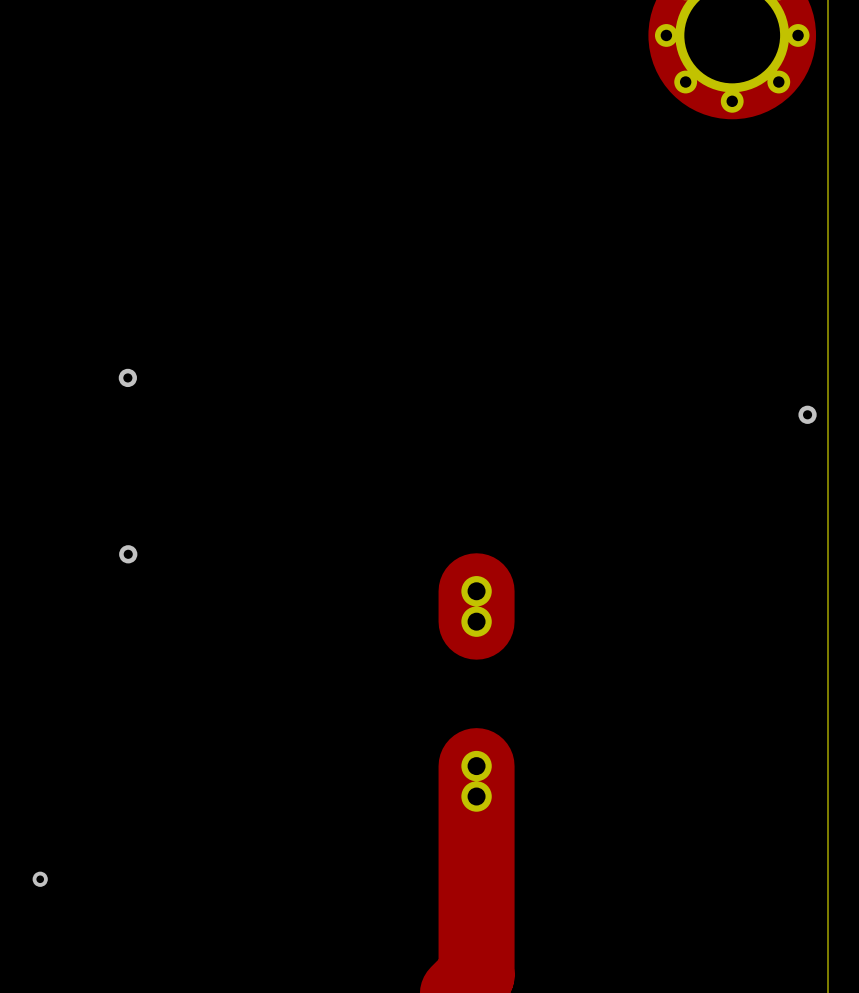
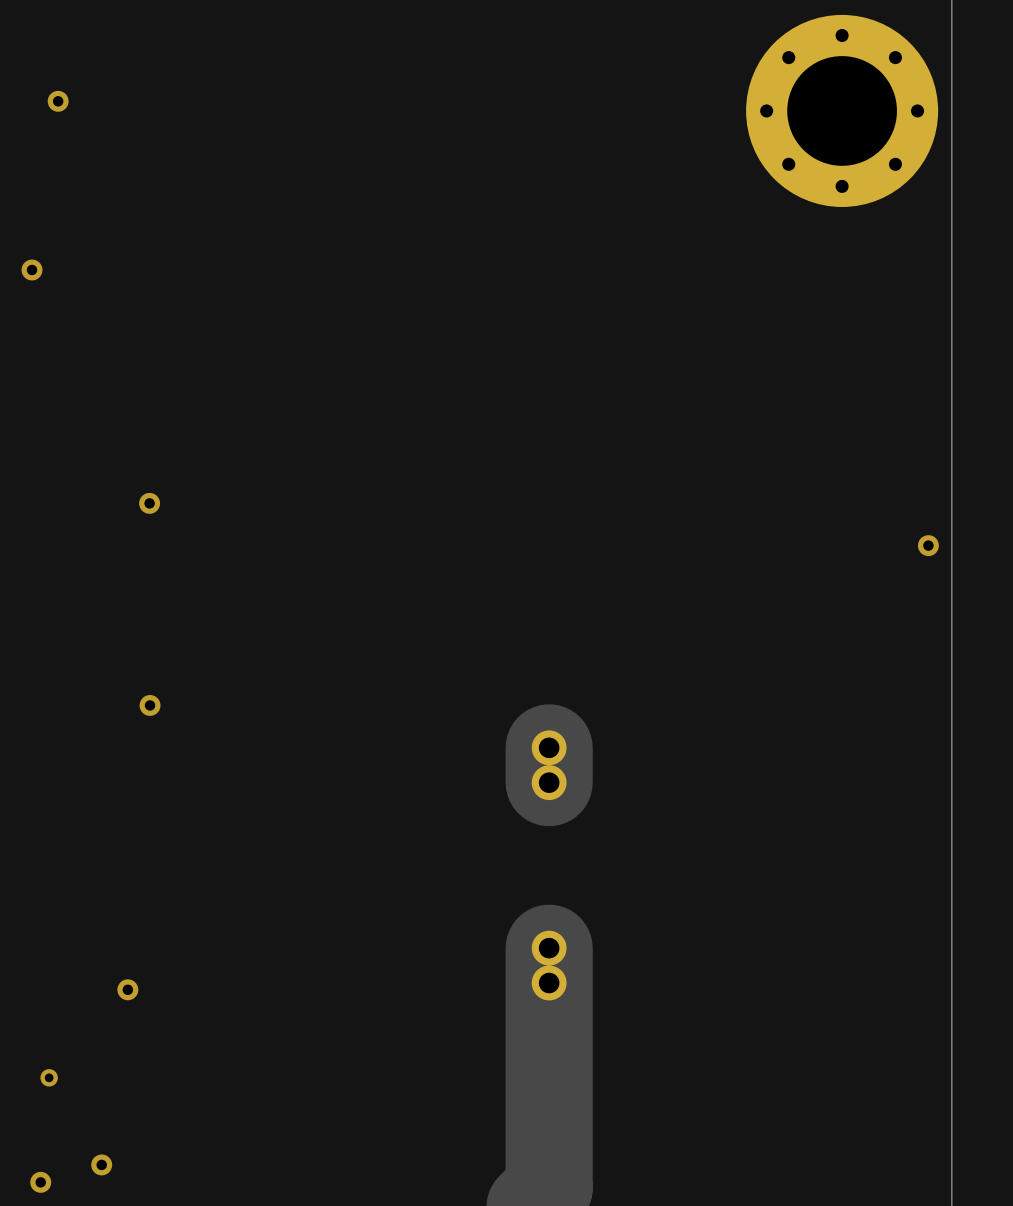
via: none -> (58, 101)
via: none -> (32, 270)
via: none -> (127, 989)
via: none -> (101, 1164)
via: none -> (40, 1182)

